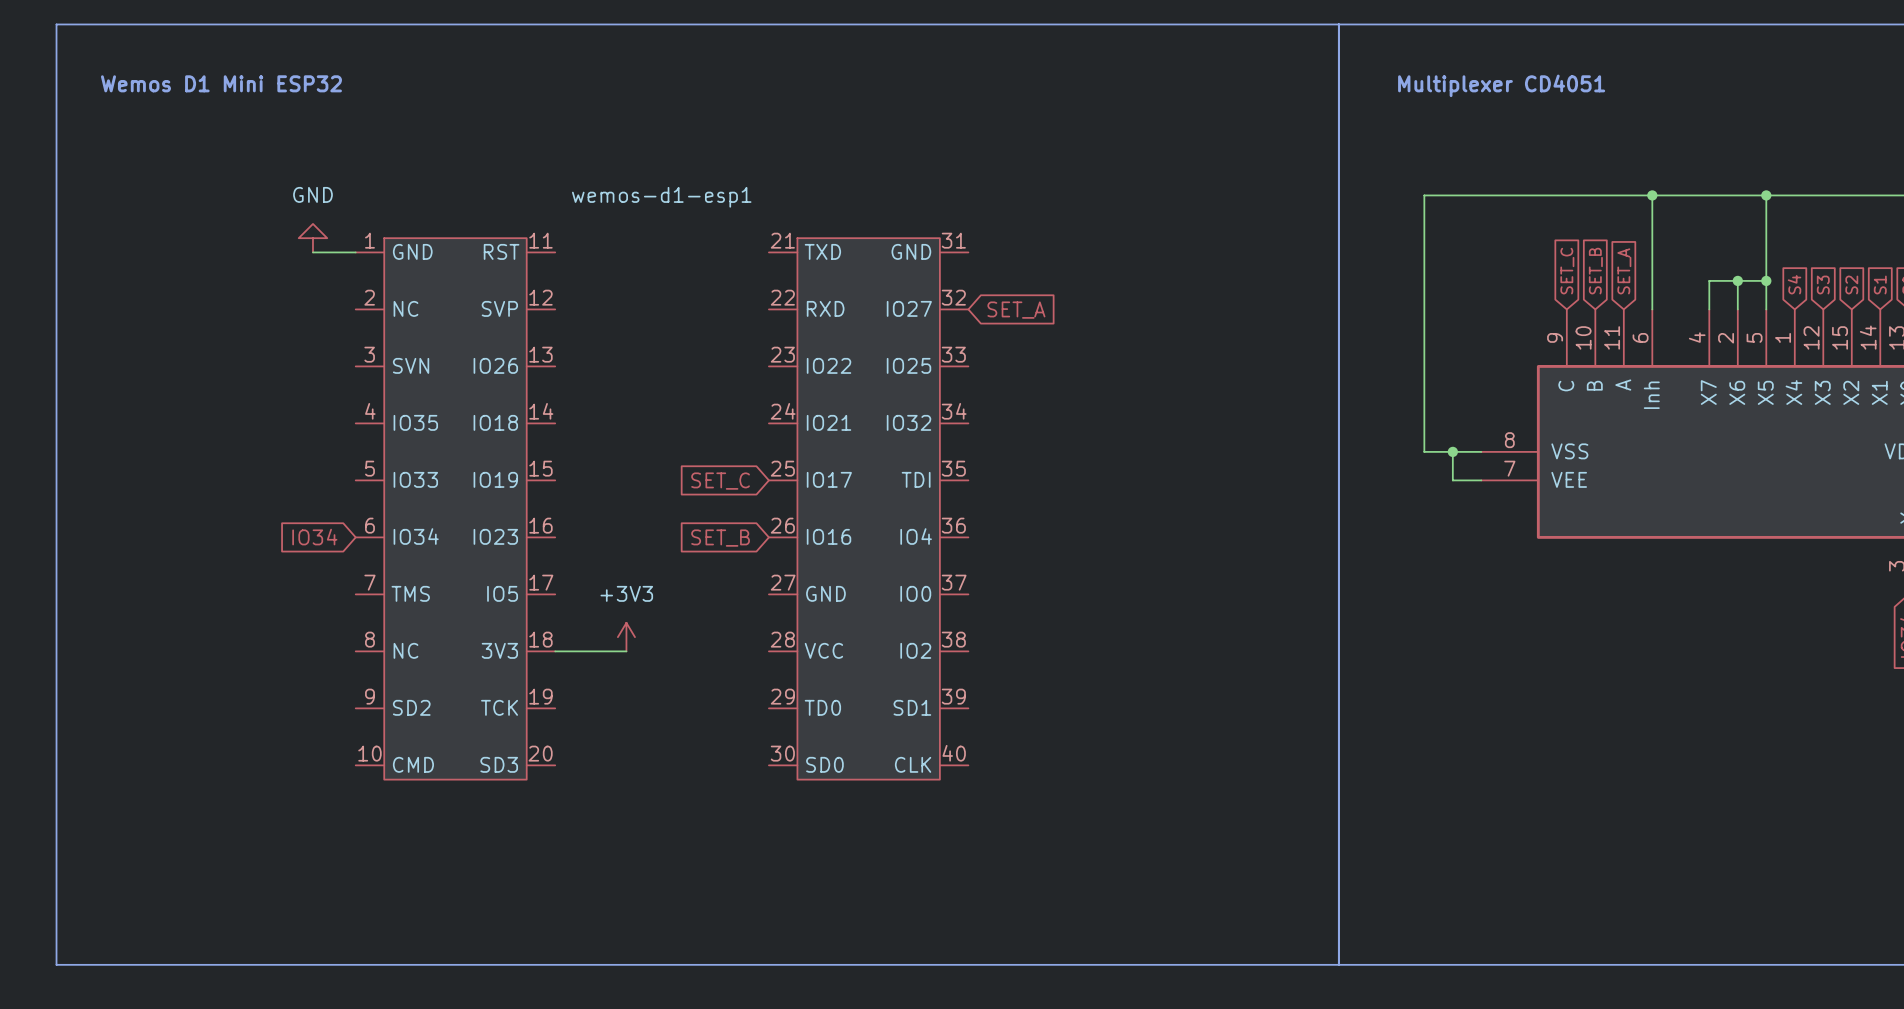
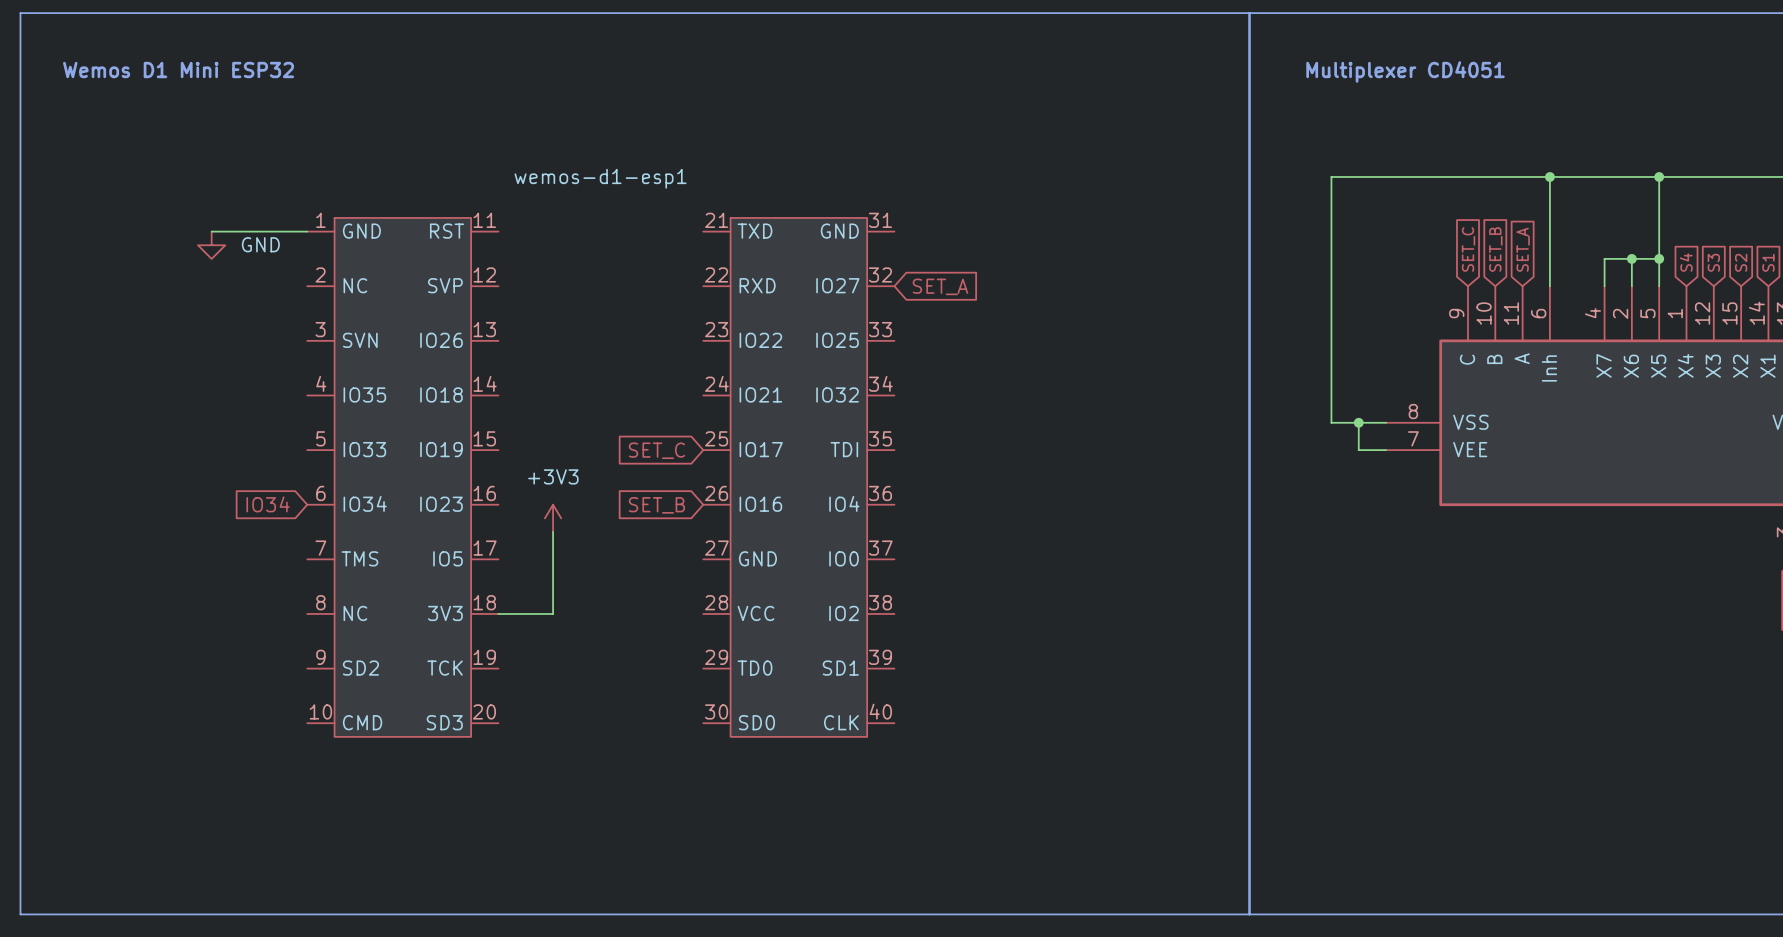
power symbol text position: GND (312, 194) -> GND (260, 244)
power symbol rotation: 0° (312, 238) -> 180° (211, 245)
power symbol position: GND (312, 238) -> GND (211, 245)
wire: none -> (211, 231) (266, 231)
power symbol position: +3V3 (626, 637) -> +3V3 (553, 518)
wire: (612, 651) (626, 651) -> (553, 613) (553, 532)

